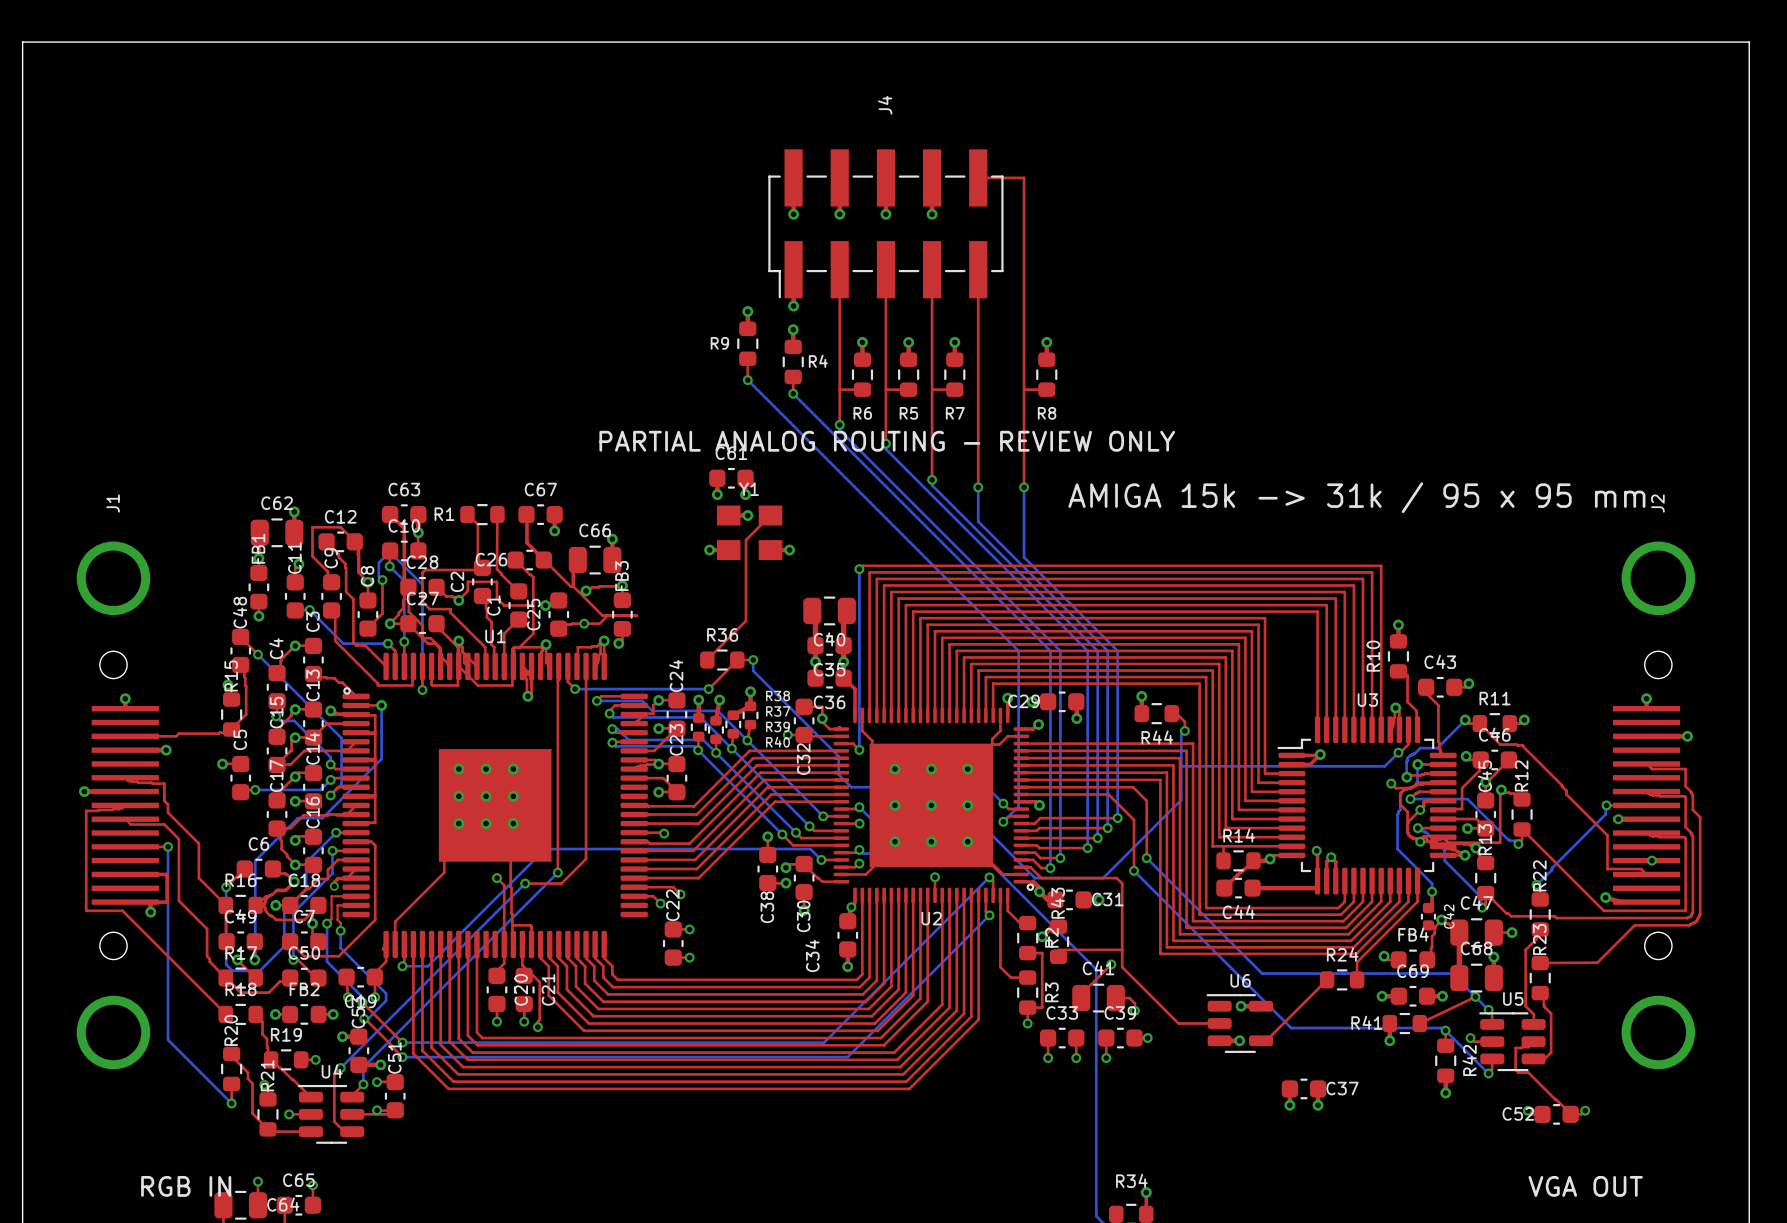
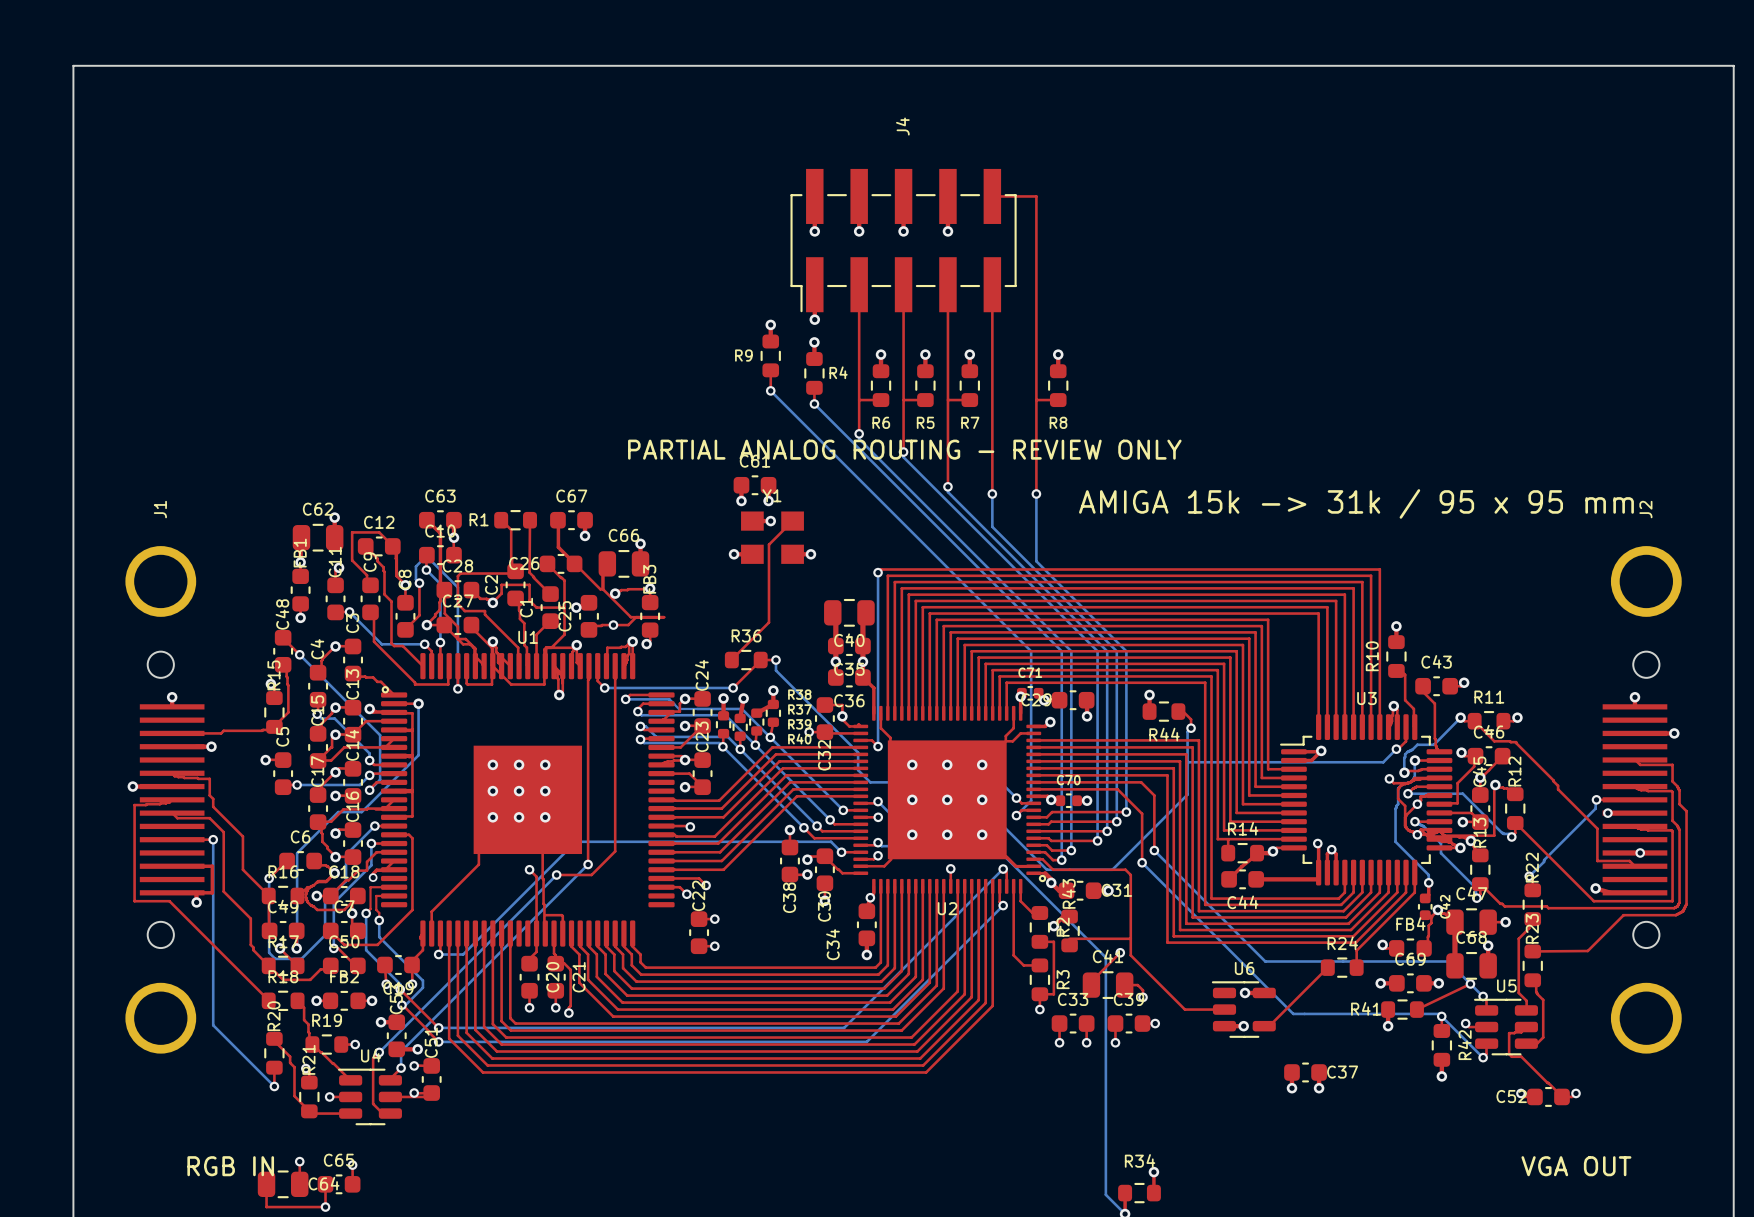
C71: none -> (1030, 693)
C70: none -> (1068, 800)
via: none -> (1087, 800)

